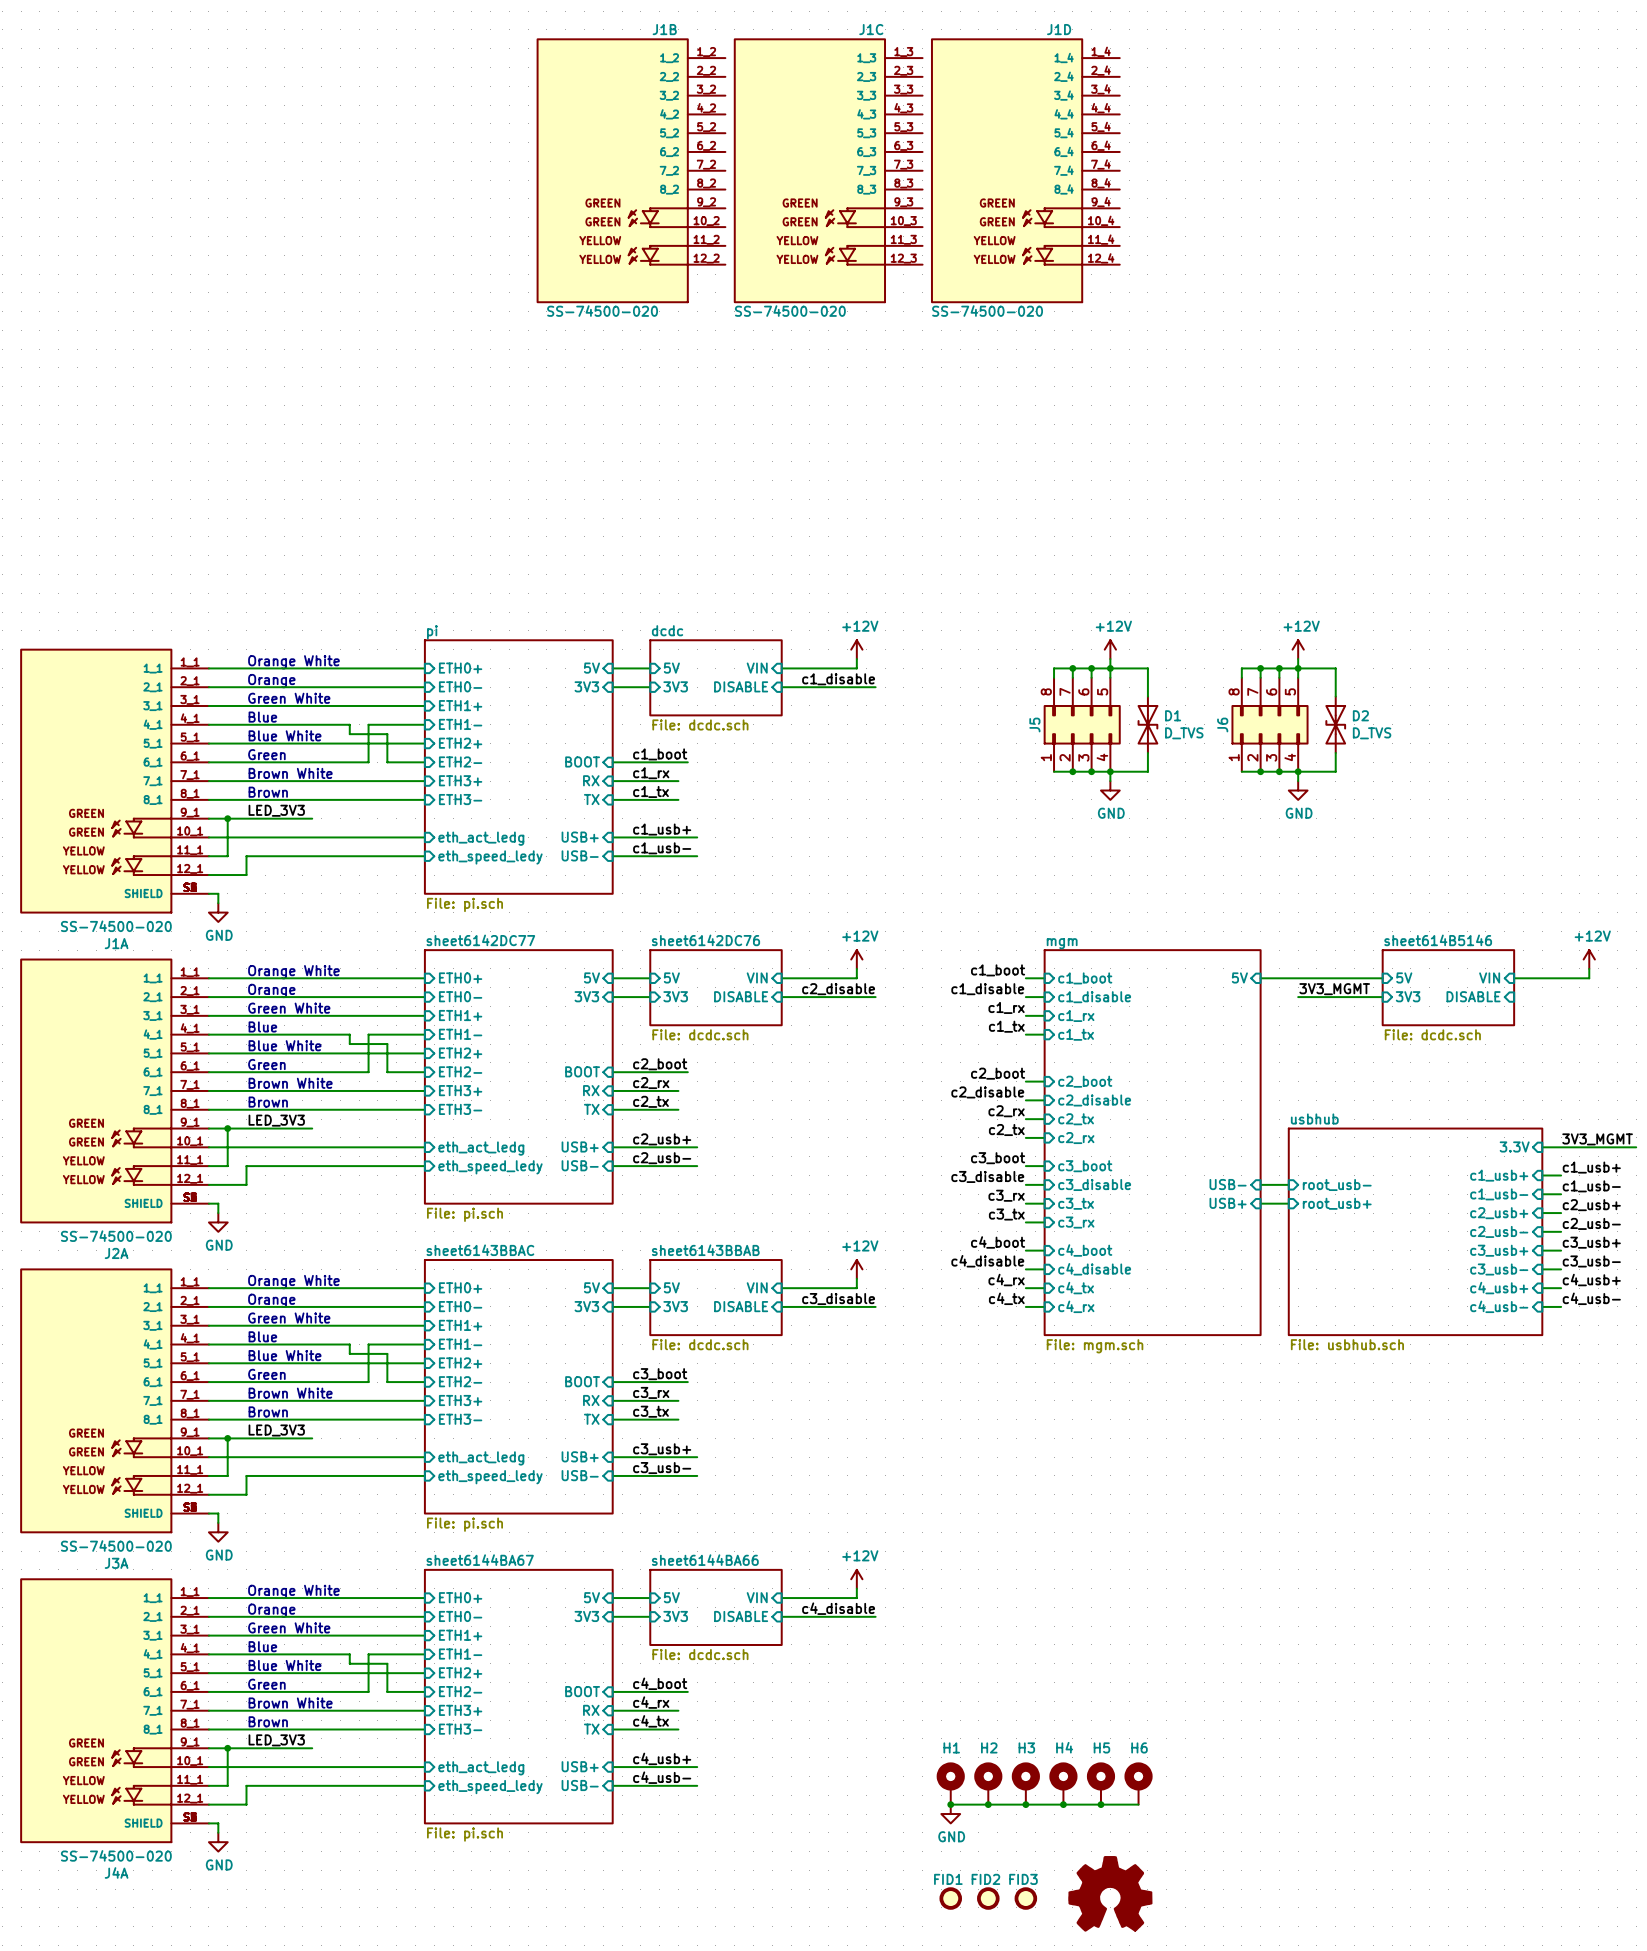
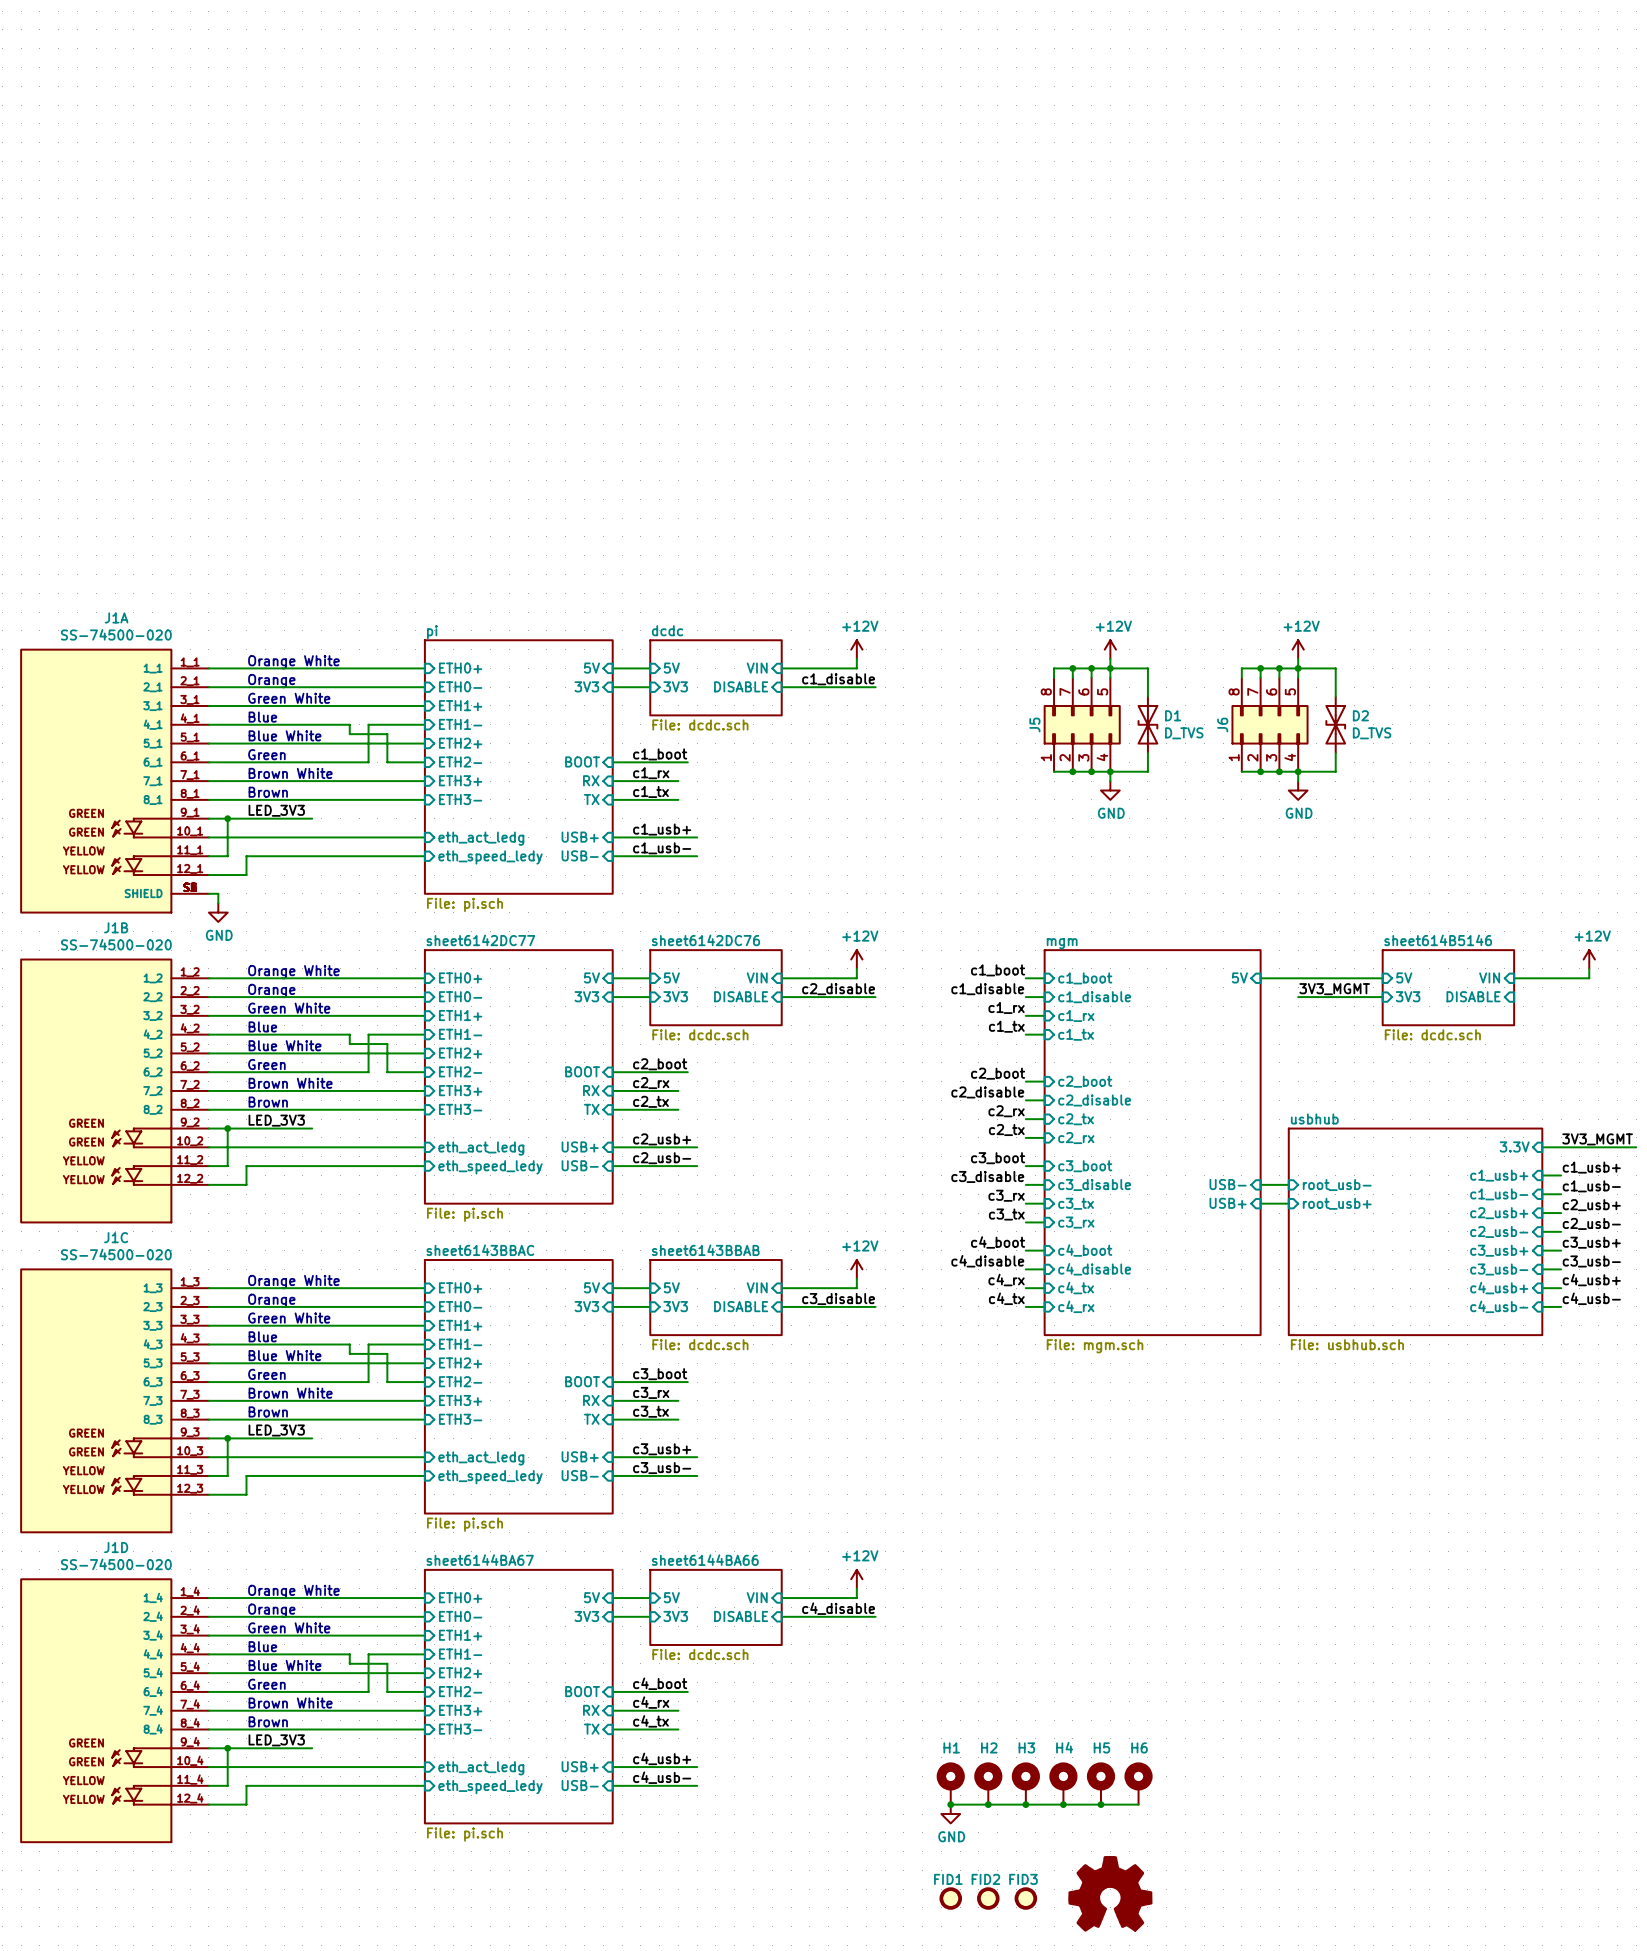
J1B name position: J1B (664, 29) -> J1B (116, 927)
J1C name position: J1C (871, 29) -> J1C (116, 1237)
J1D name position: J1D (1059, 29) -> J1D (116, 1547)
J1B position: (631, 170) -> (114, 1090)
J1C position: (828, 170) -> (114, 1400)
J1D position: (1025, 170) -> (114, 1710)
J1B value position: SS-74500-020 (602, 311) -> SS-74500-020 (116, 944)
J1C value position: SS-74500-020 (790, 311) -> SS-74500-020 (116, 1254)
J1D value position: SS-74500-020 (987, 311) -> SS-74500-020 (116, 1564)
J1A value position: SS-74500-020 (116, 926) -> SS-74500-020 (116, 634)
J1A name position: J1A (116, 943) -> J1A (116, 617)
J2A: SS-74500-020 (114, 1090) -> none
wire: (208, 1203) (218, 1203) (218, 1213) -> none
power symbol: GND (218, 1222) -> none
J3A: SS-74500-020 (114, 1400) -> none
wire: (208, 1513) (218, 1513) (218, 1522) -> none
power symbol: GND (218, 1532) -> none
J4A: SS-74500-020 (114, 1710) -> none
wire: (208, 1823) (218, 1823) (218, 1832) -> none
power symbol: GND (218, 1842) -> none

